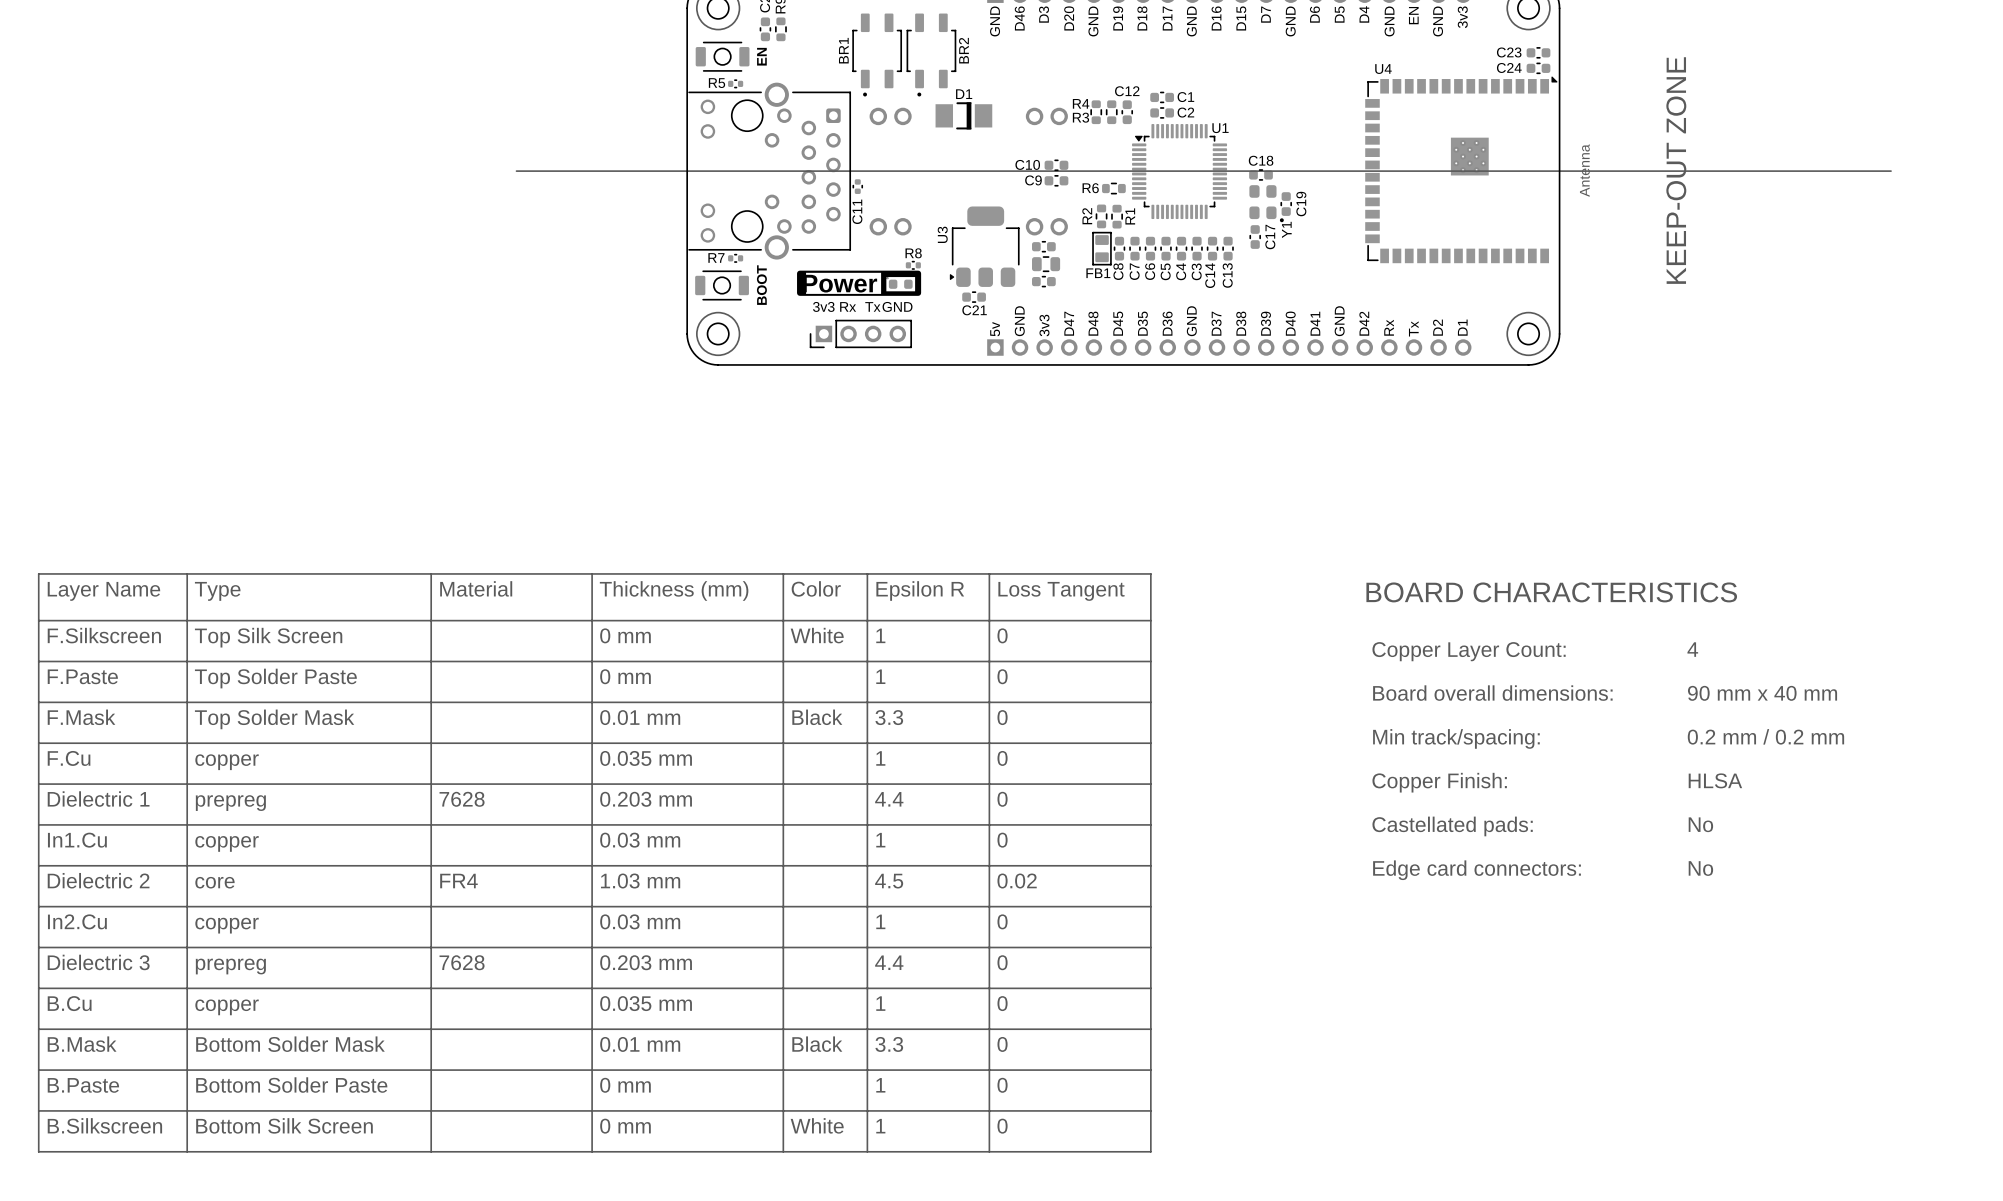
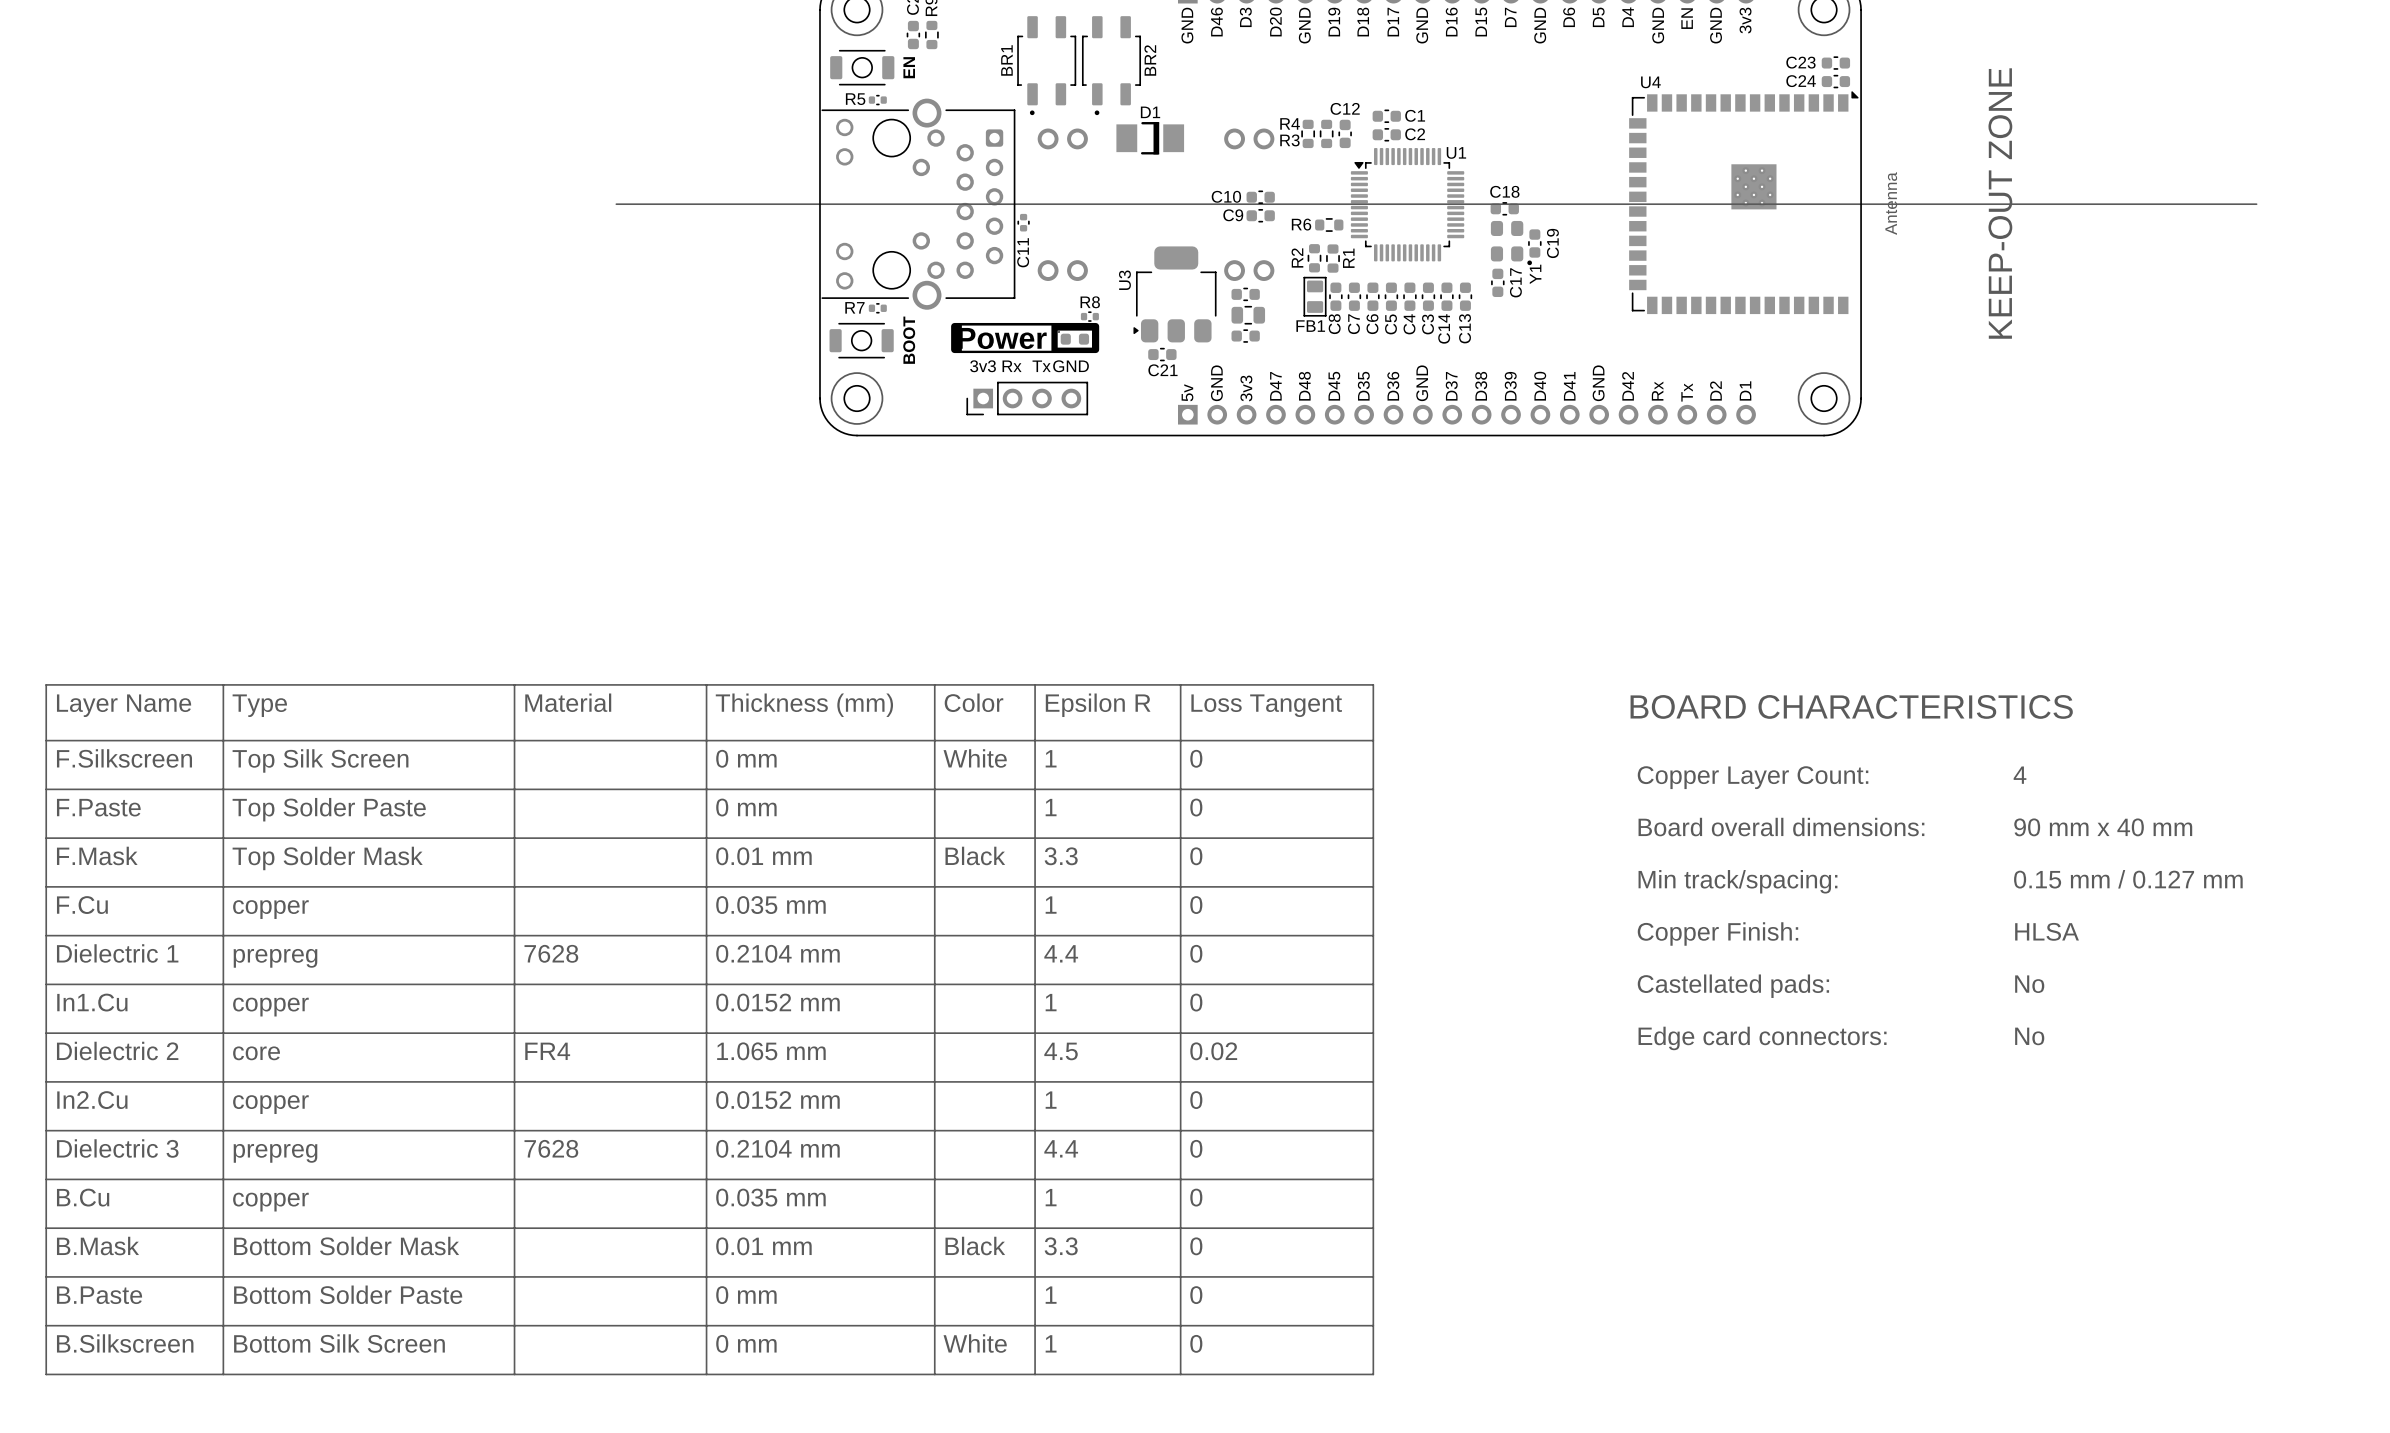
text: 0.2 mm / 0.2 mm (1765, 736) -> 0.15 mm / 0.127 mm (2128, 879)
text: 0.203 mm (646, 799) -> 0.2104 mm (777, 953)
text: 0.03 mm (640, 840) -> 0.0152 mm (777, 1002)
text: 1.03 mm (640, 881) -> 1.065 mm (771, 1051)
text: 0.03 mm (640, 921) -> 0.0152 mm (777, 1100)
text: 0.203 mm (646, 962) -> 0.2104 mm (777, 1148)

